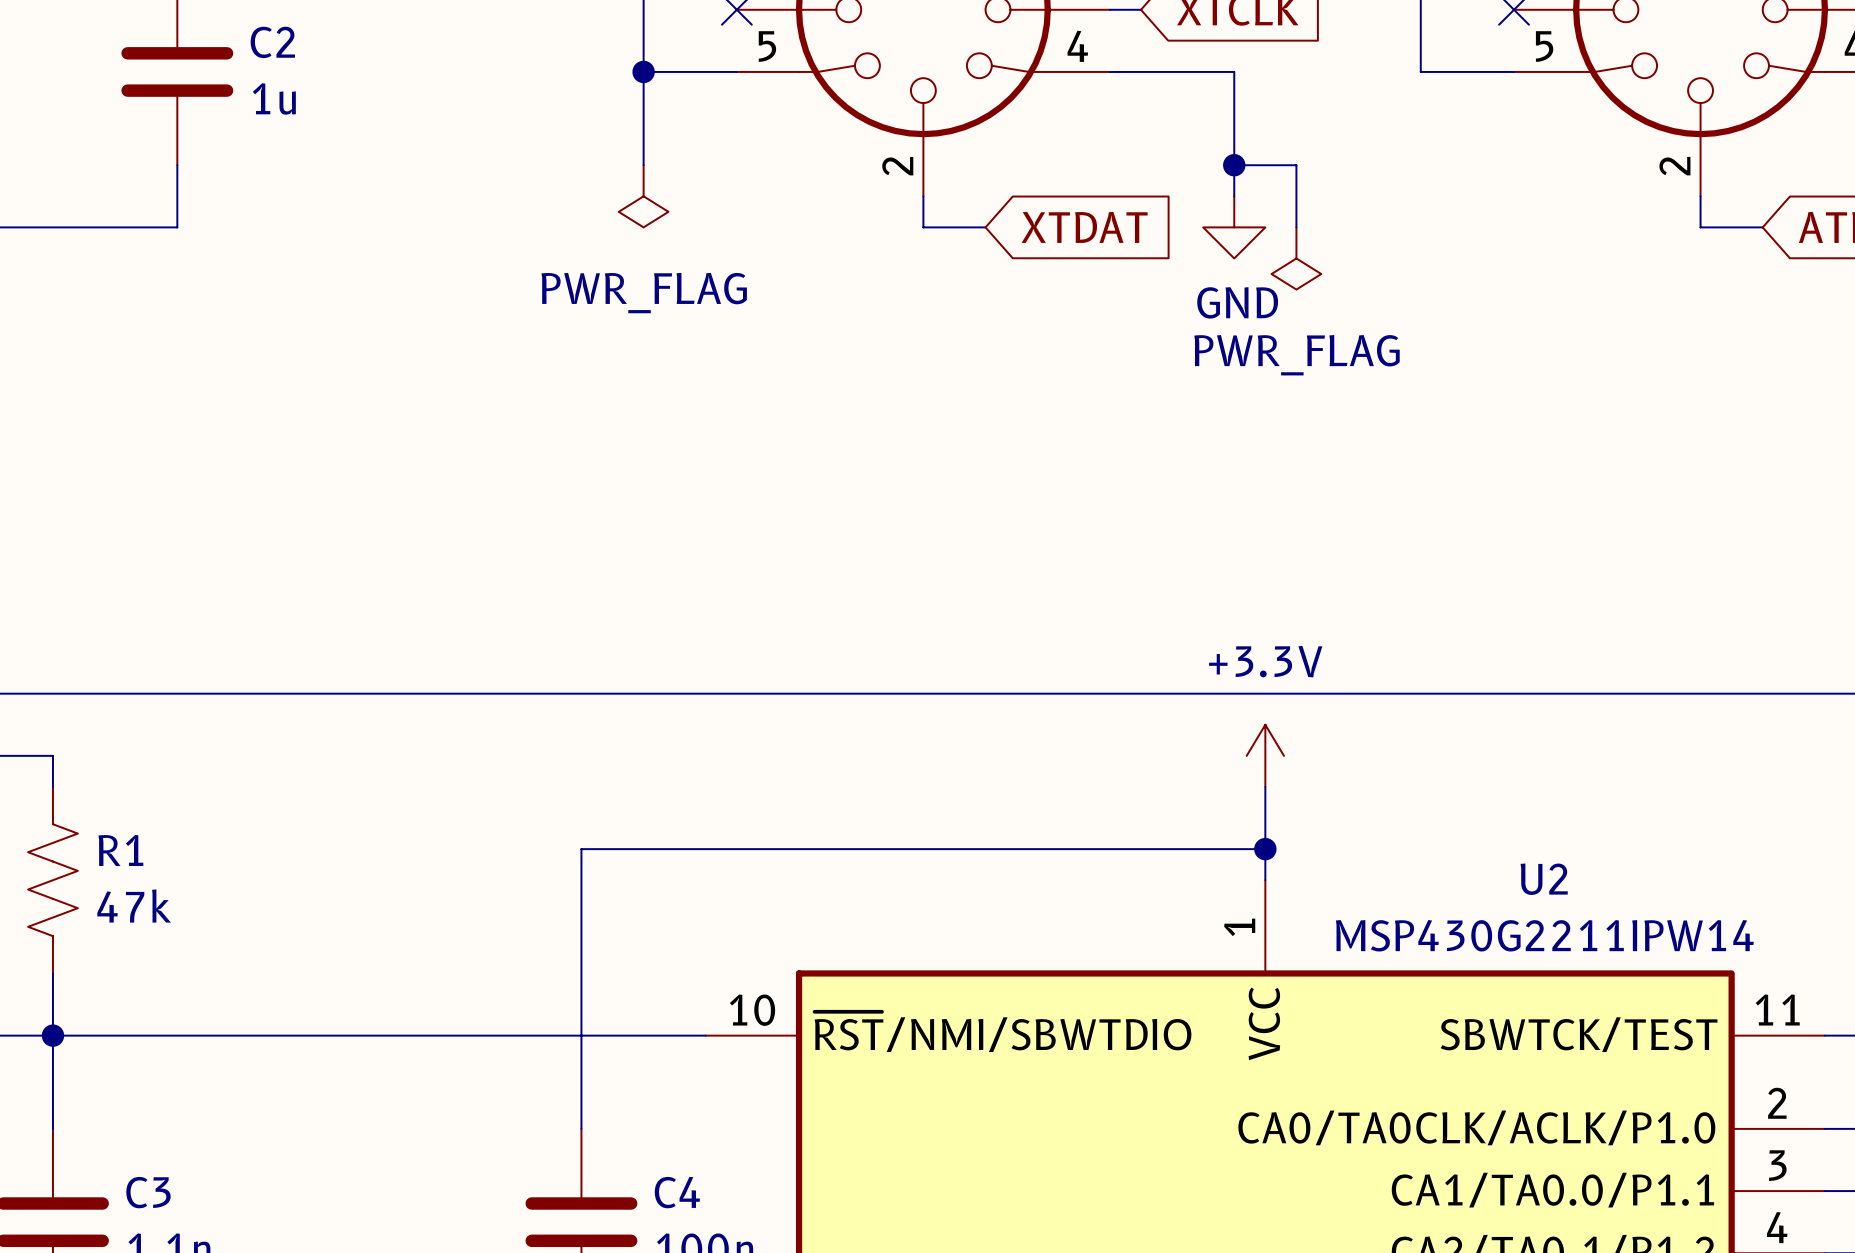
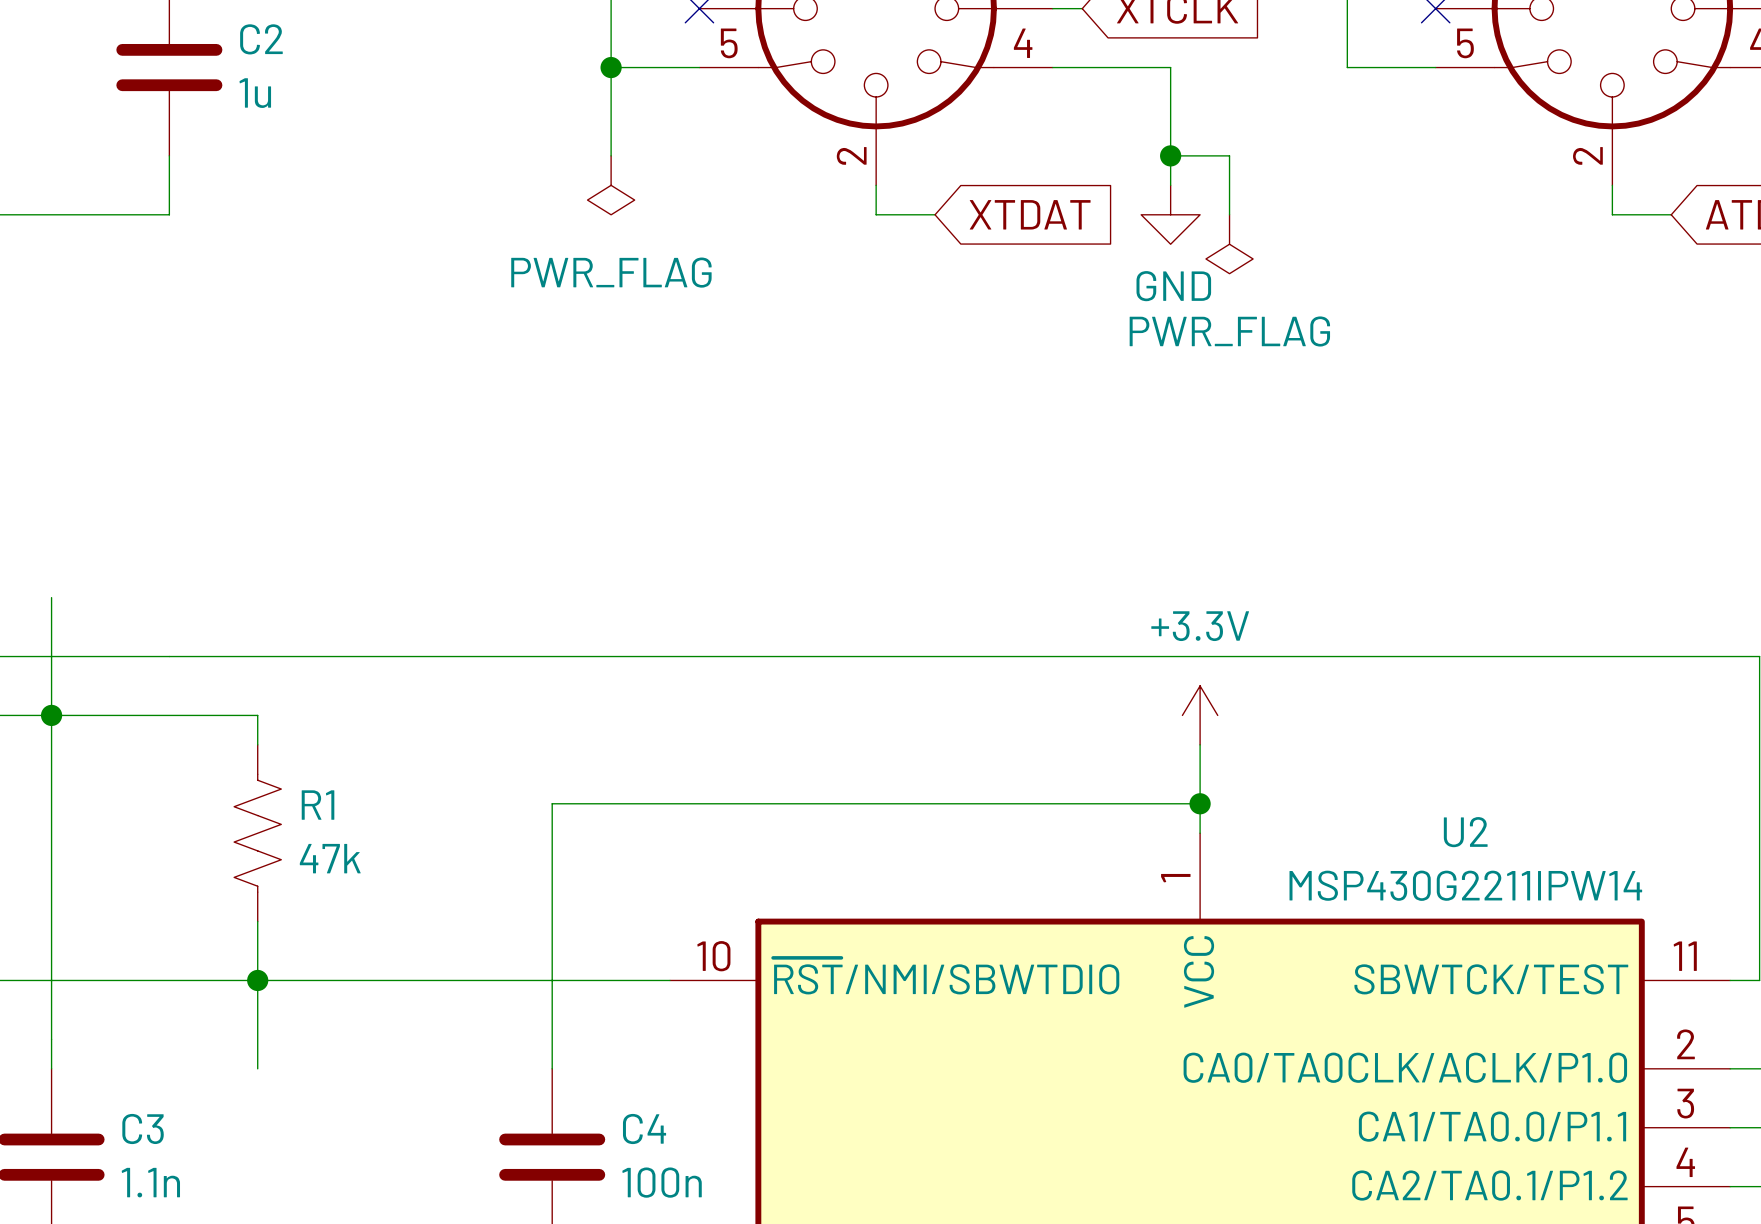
wire: none -> (51, 597) (51, 715) (257, 715) (257, 744)
junction: none -> (51, 715)
wire: none -> (51, 744) (51, 921)
R1 position: (52, 880) -> (257, 833)
wire: none -> (257, 921) (257, 1068)
junction: (52, 1035) -> none
junction: none -> (257, 980)

